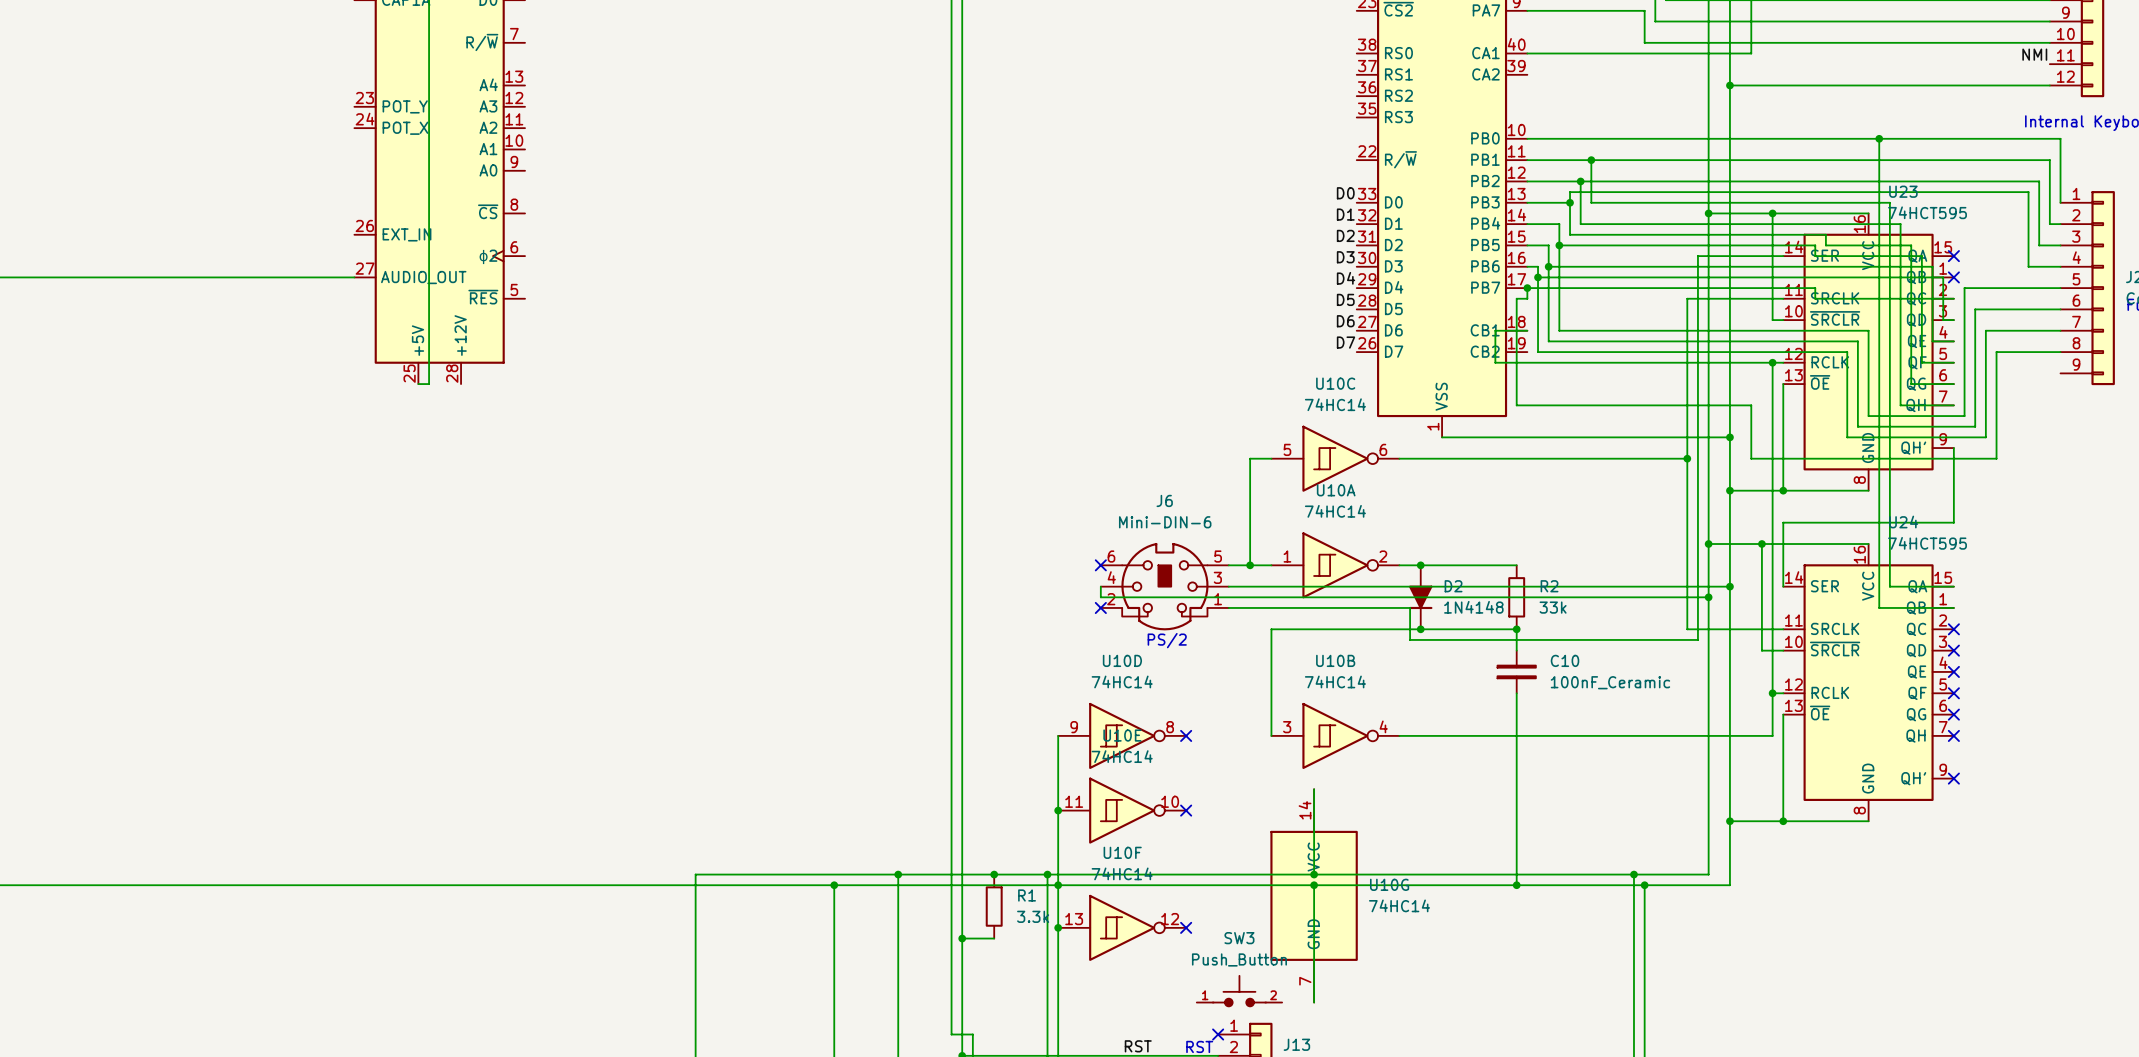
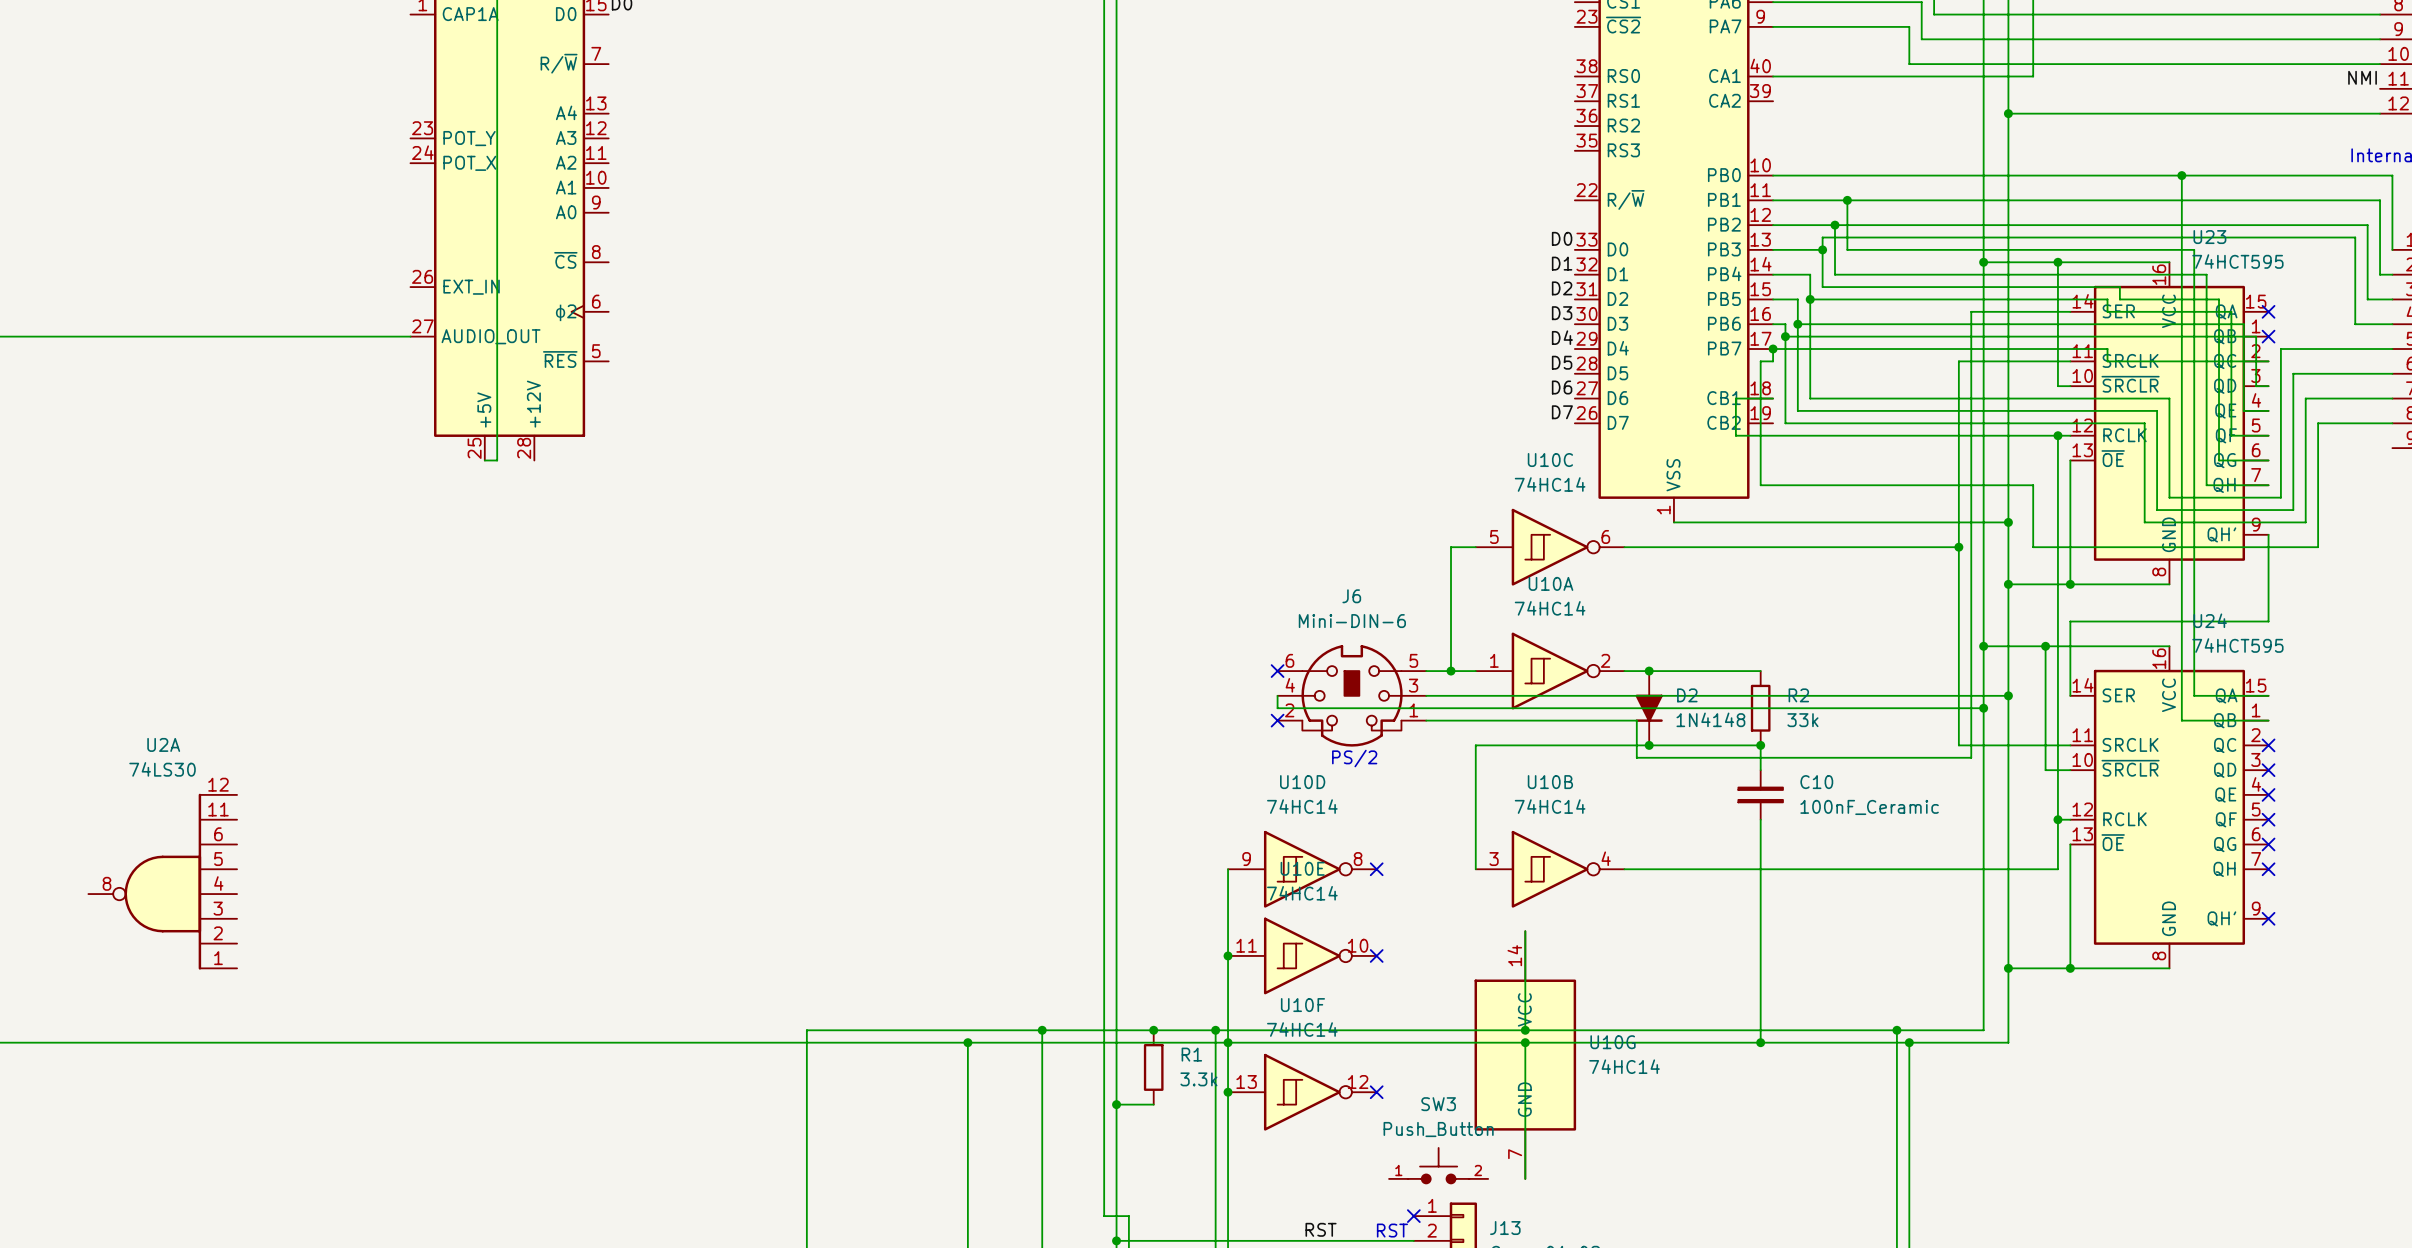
U2A: none -> 74LS30 (162, 881)

